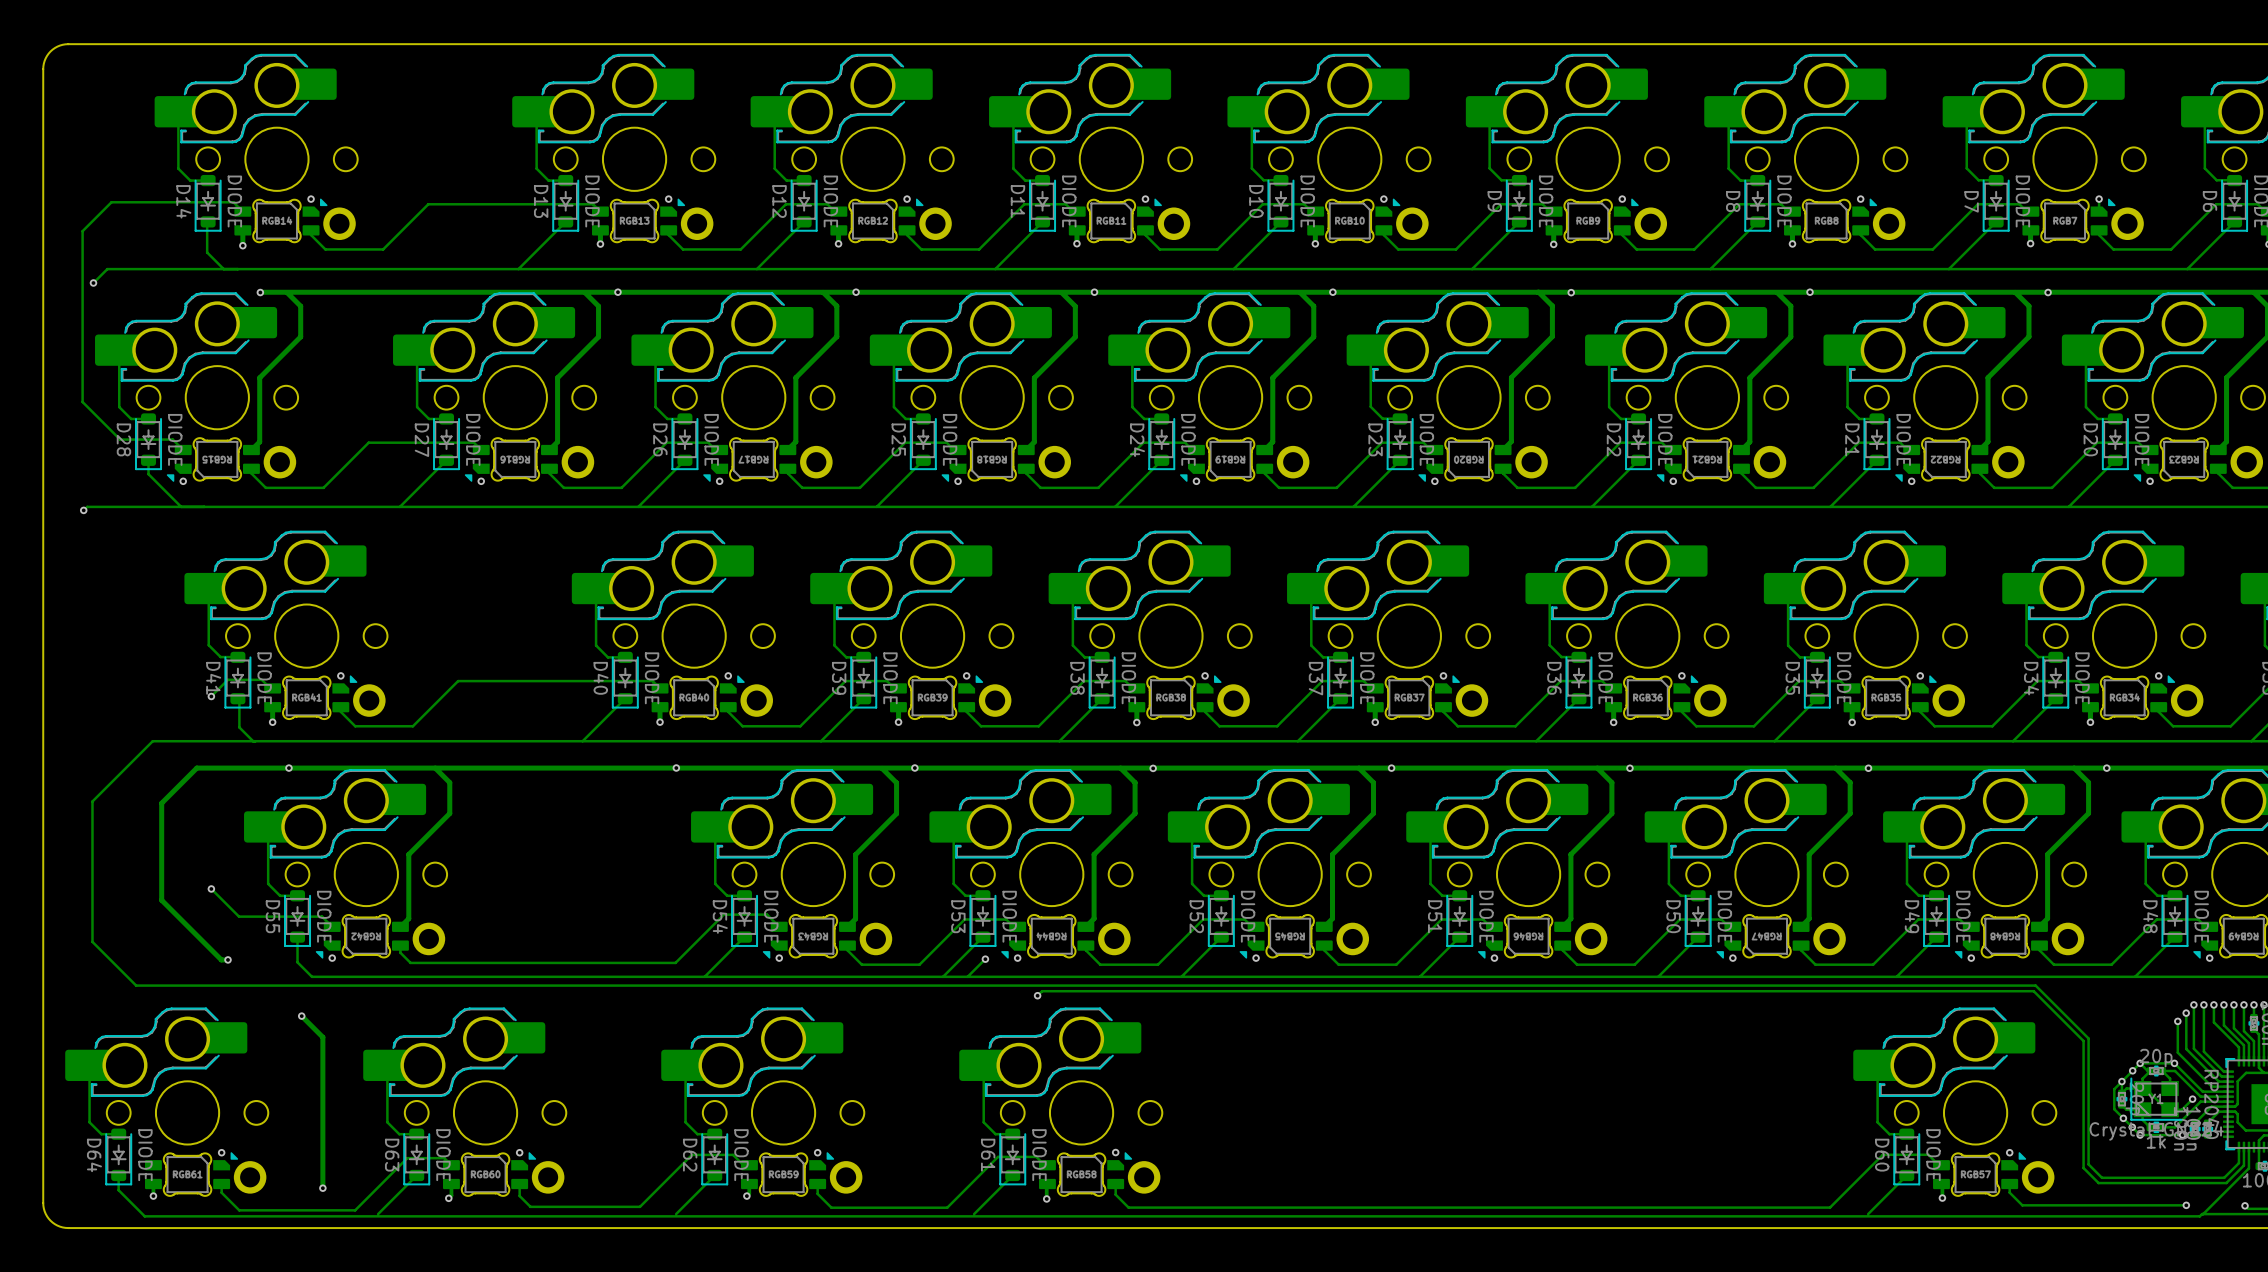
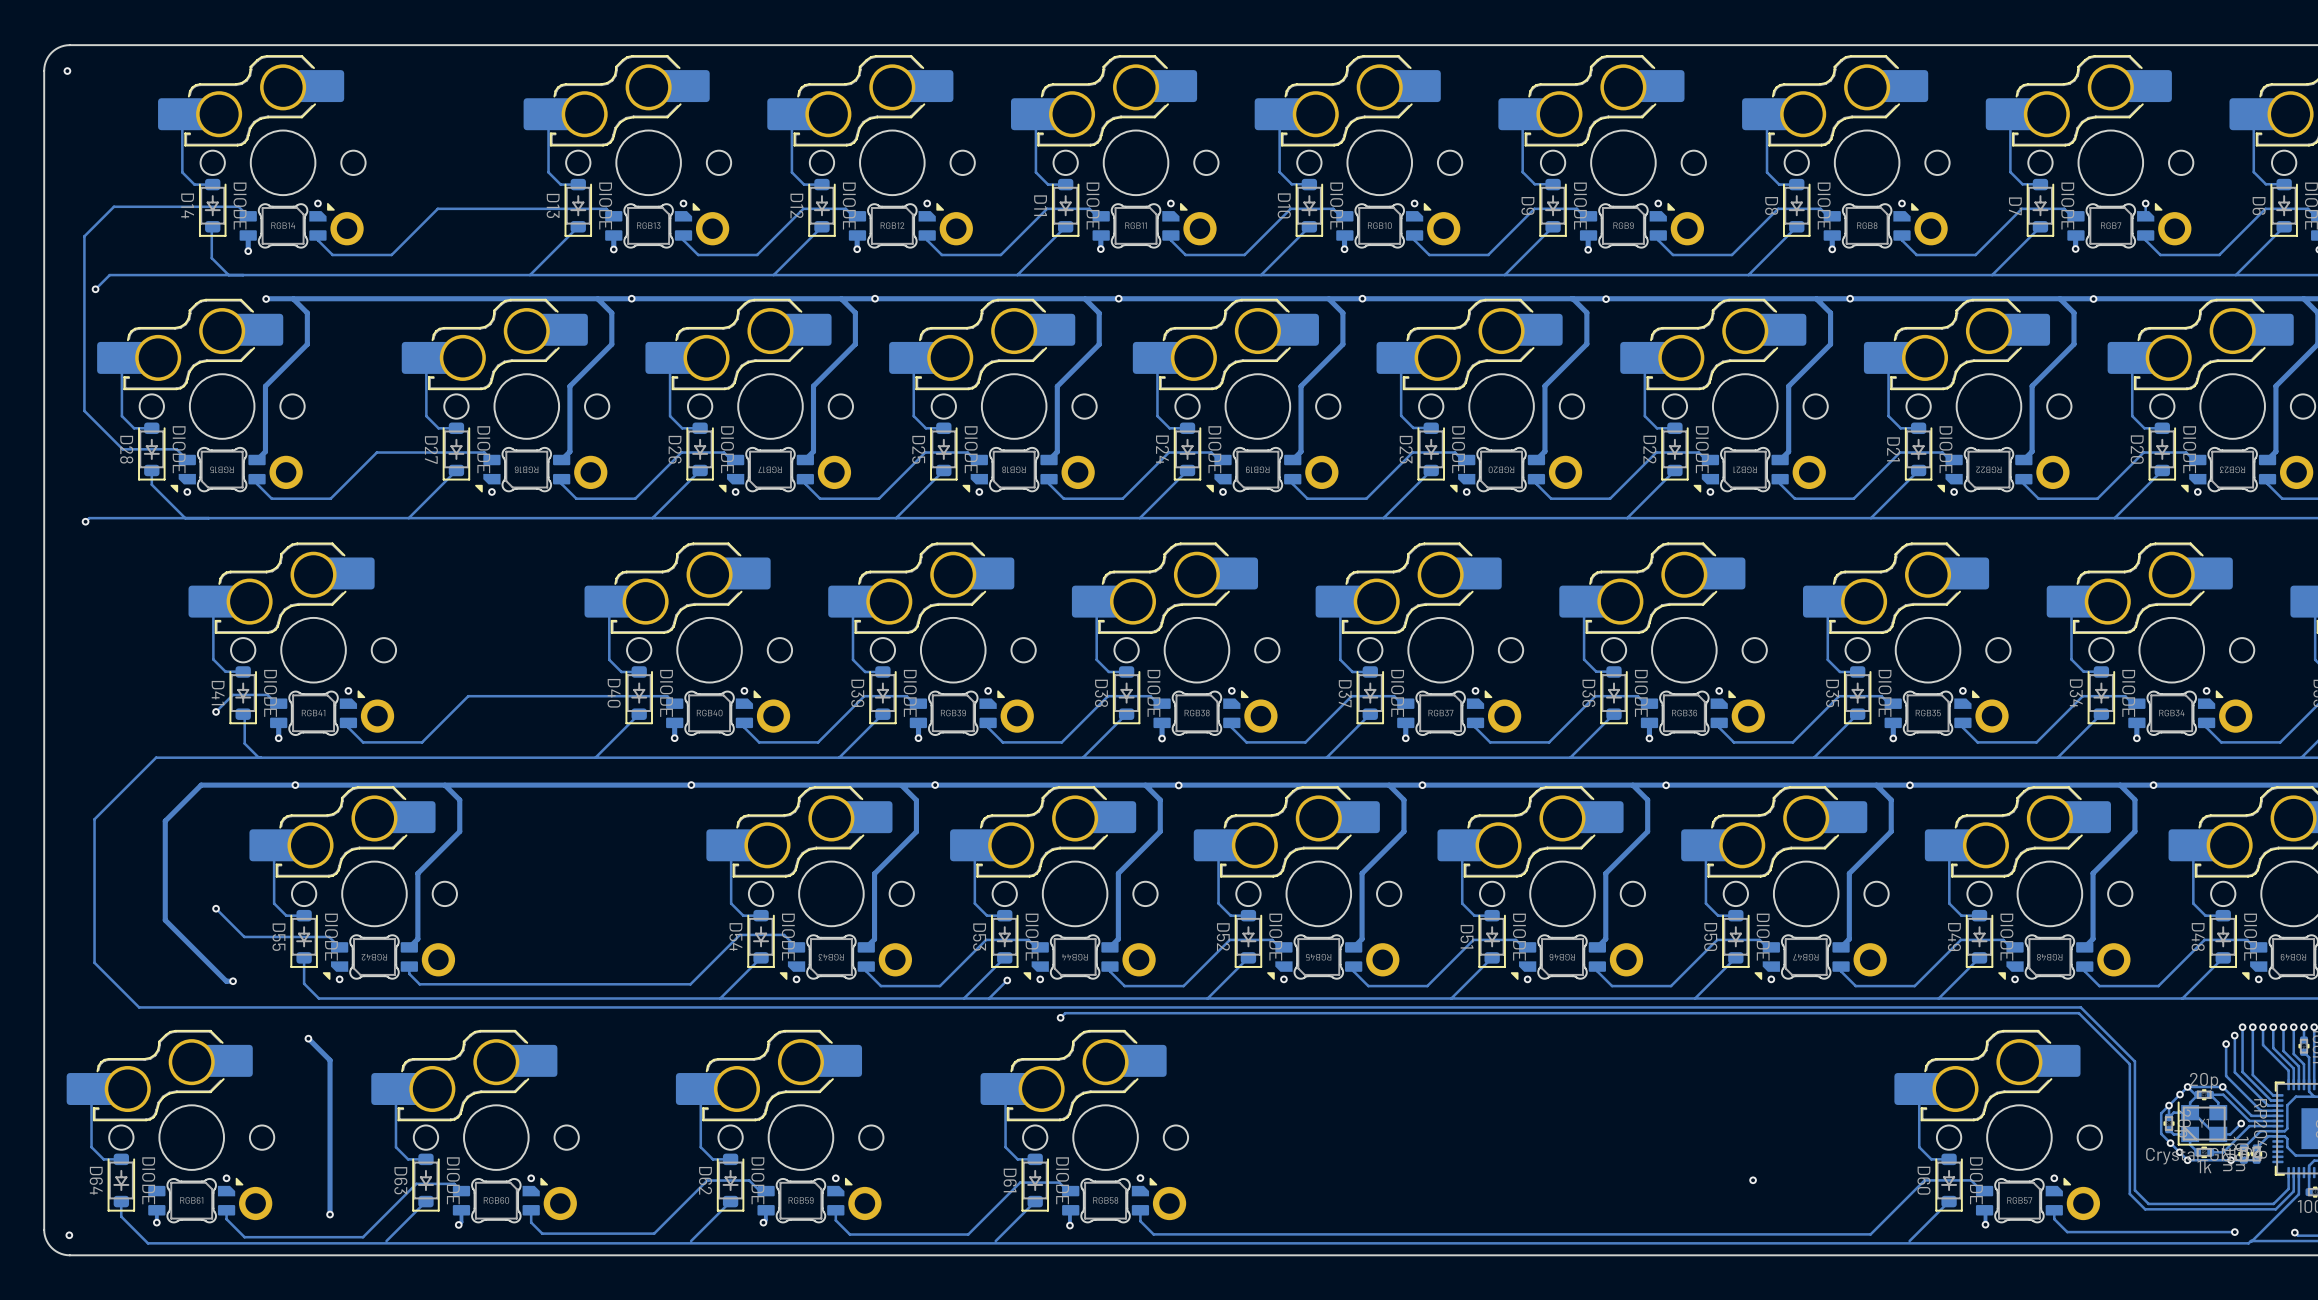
via: none -> (67, 71)
via: none -> (1753, 1180)
via: none -> (69, 1235)

